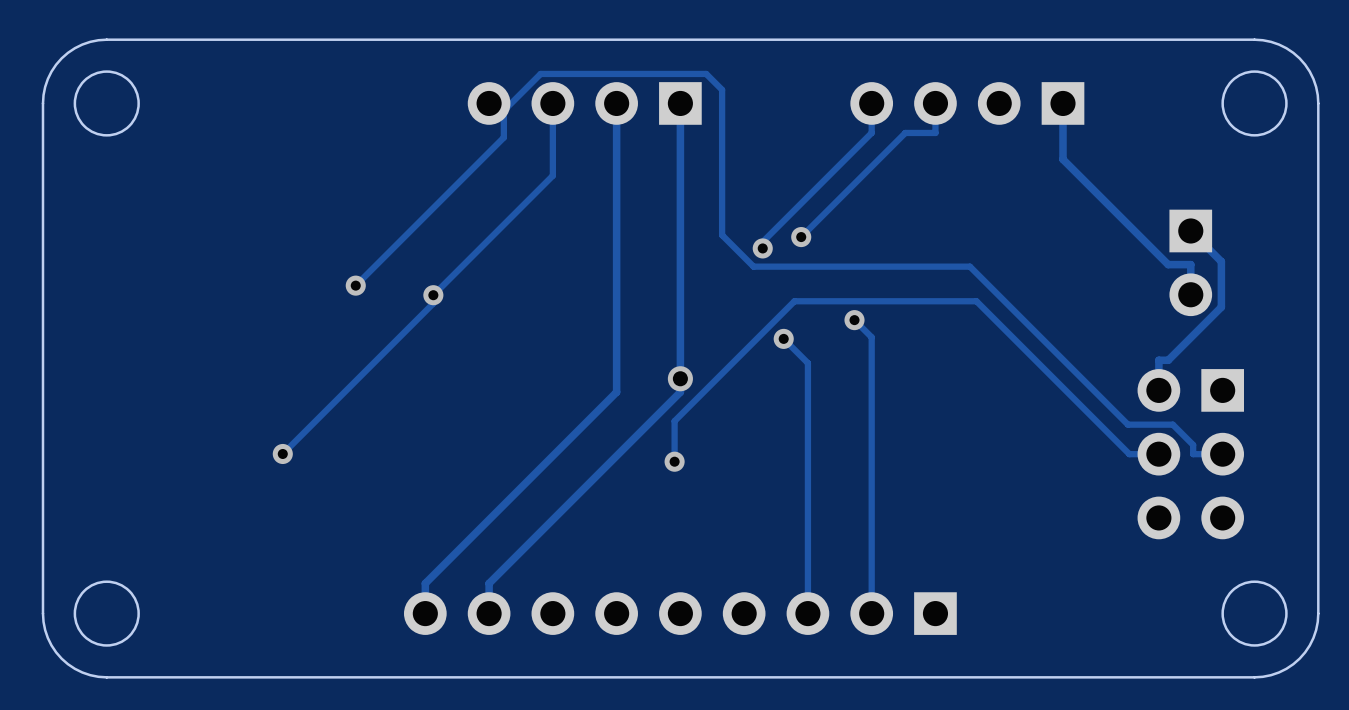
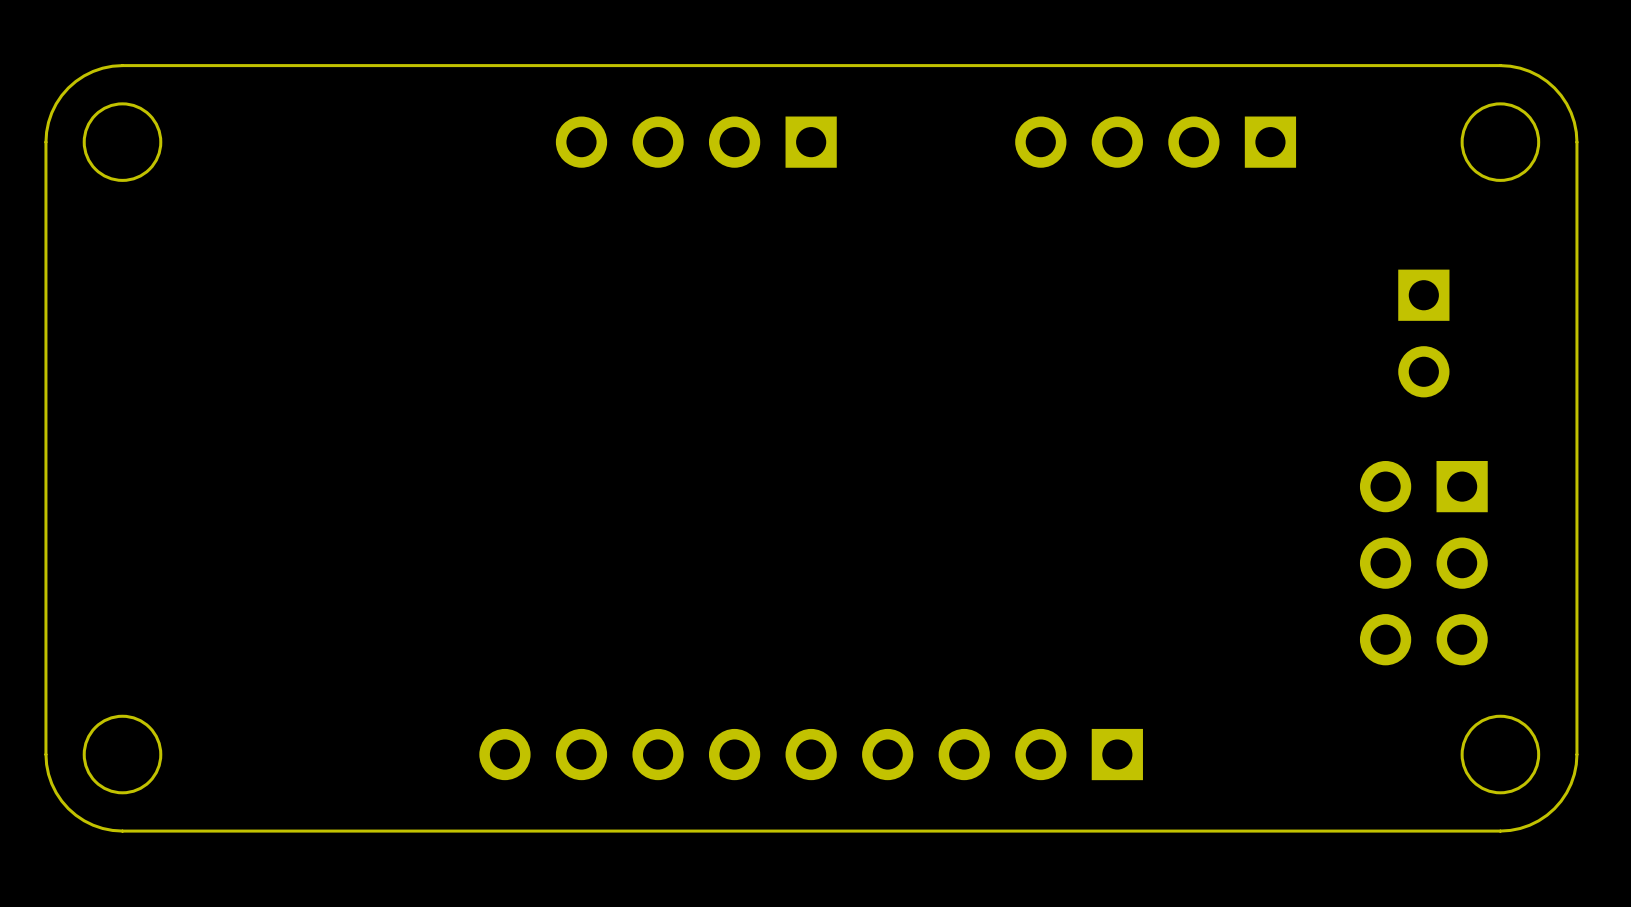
track: (489, 103) (503, 103) (503, 137) (355, 285) -> none
track: (552, 103) (552, 175) (433, 295) (433, 303) (282, 453) -> none
track: (616, 103) (616, 392) (425, 583) (425, 613) -> none
track: (680, 103) (680, 392) (489, 583) (489, 613) -> none
track: (871, 103) (871, 132) (762, 241) (762, 248) -> none
track: (935, 103) (935, 132) (905, 132) (801, 237) -> none
track: (1063, 103) (1063, 159) (1168, 264) (1190, 264) (1190, 294) -> none
track: (503, 110) (540, 73) (706, 73) (722, 89) (722, 235) (753, 266) (969, 266) (1127, 424) (1172, 424) (1193, 444) (1193, 454) (1222, 454) -> none
track: (1190, 230) (1221, 261) (1221, 307) (1168, 360) (1158, 360) (1158, 390) -> none
via: (801, 237) -> none
via: (762, 248) -> none
via: (355, 285) -> none
via: (433, 295) -> none
track: (854, 320) (871, 337) (871, 613) -> none
via: (854, 320) -> none
track: (783, 338) (807, 363) (807, 613) -> none
via: (783, 338) -> none
via: (680, 378) -> none
via: (282, 453) -> none
track: (1158, 454) (1129, 454) (976, 301) (794, 301) (674, 421) (674, 461) -> none
via: (674, 461) -> none

